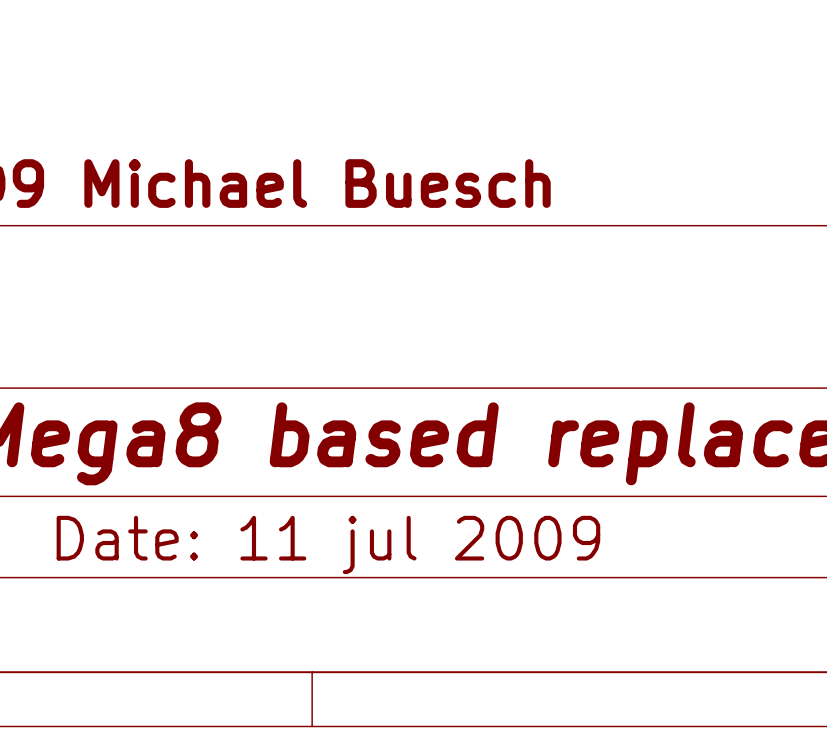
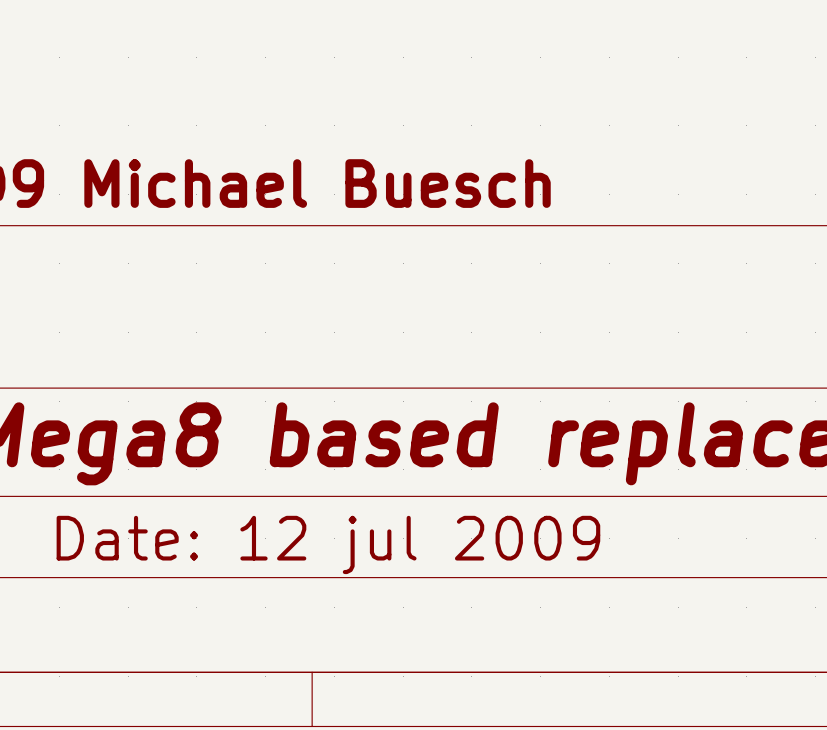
title block: Date: 11 jul 2009 (328, 544) -> Date: 12 jul 2009 (328, 544)

